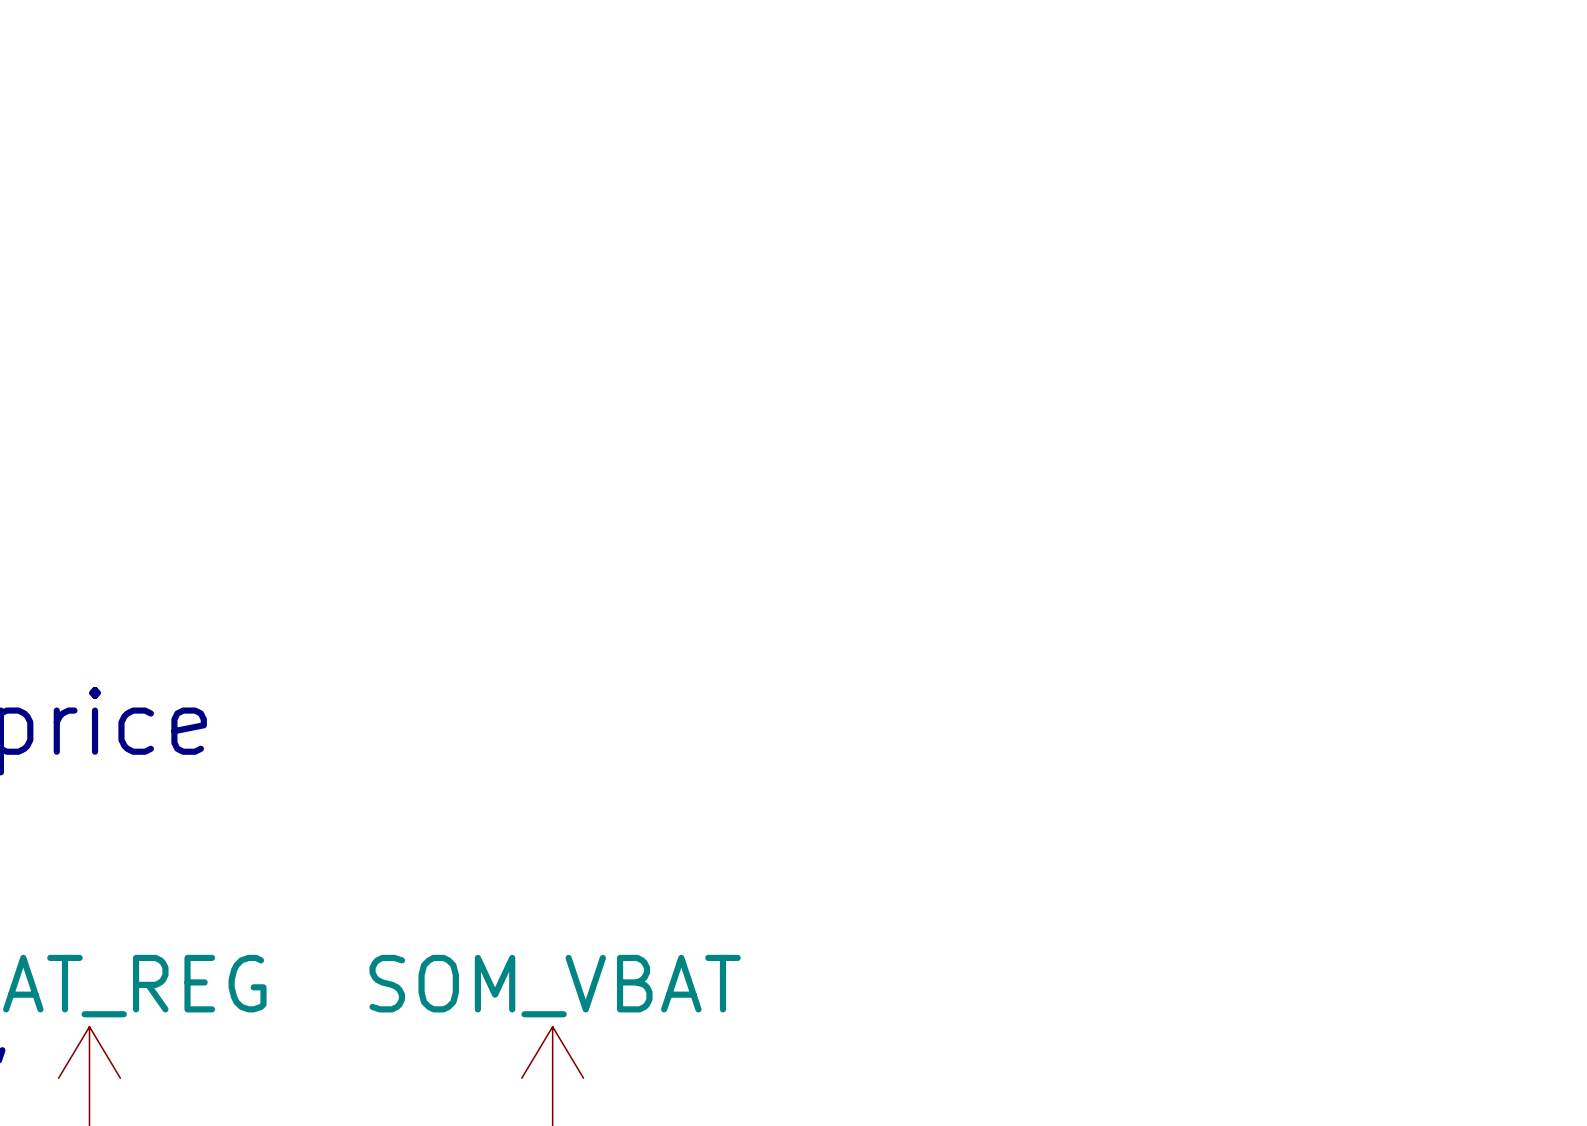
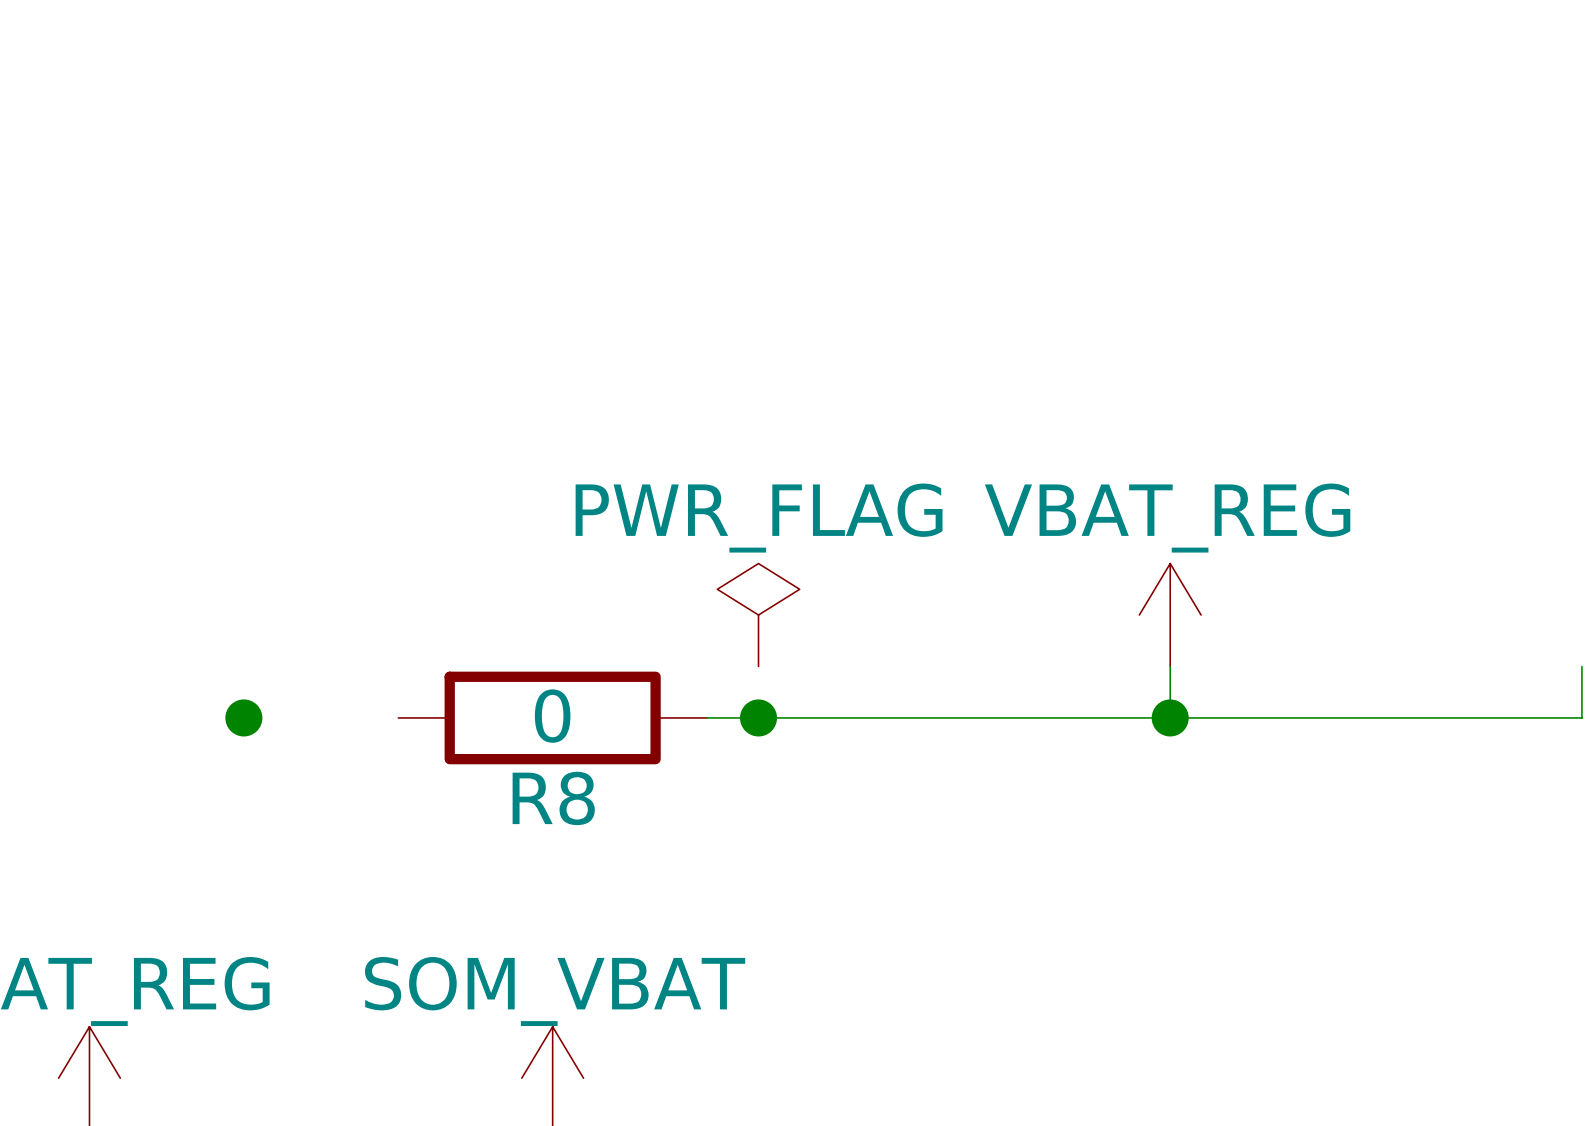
power symbol: none -> PWR_FLAG (758, 615)
power symbol: none -> VBAT_REG (1170, 615)
wire: none -> (1170, 666) (1170, 717)
wire: none -> (1581, 666) (1581, 717) (707, 717)
junction: none -> (243, 717)
R8: none -> 0 (552, 717)
junction: none -> (758, 717)
junction: none -> (1170, 717)

